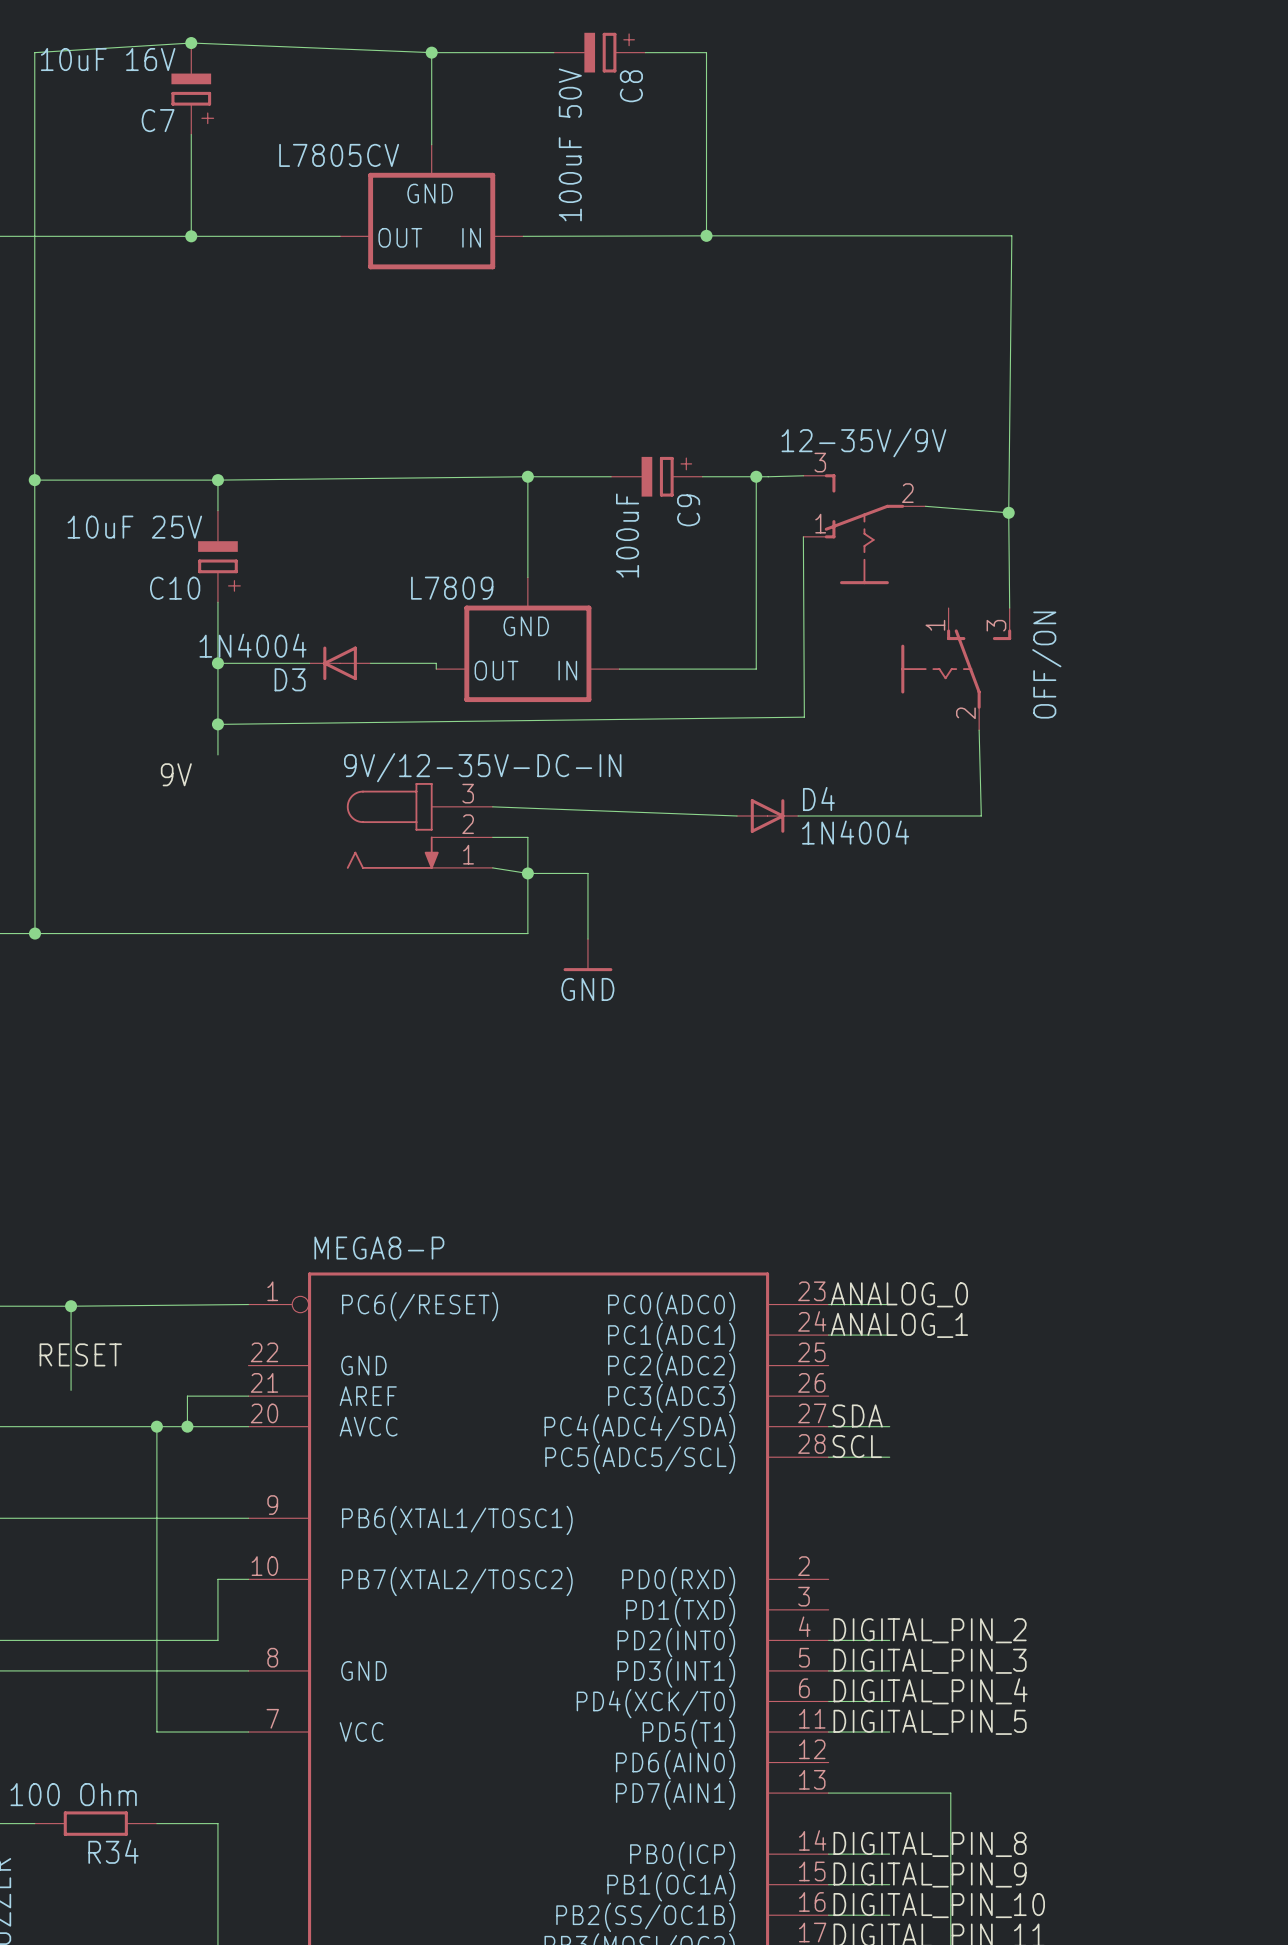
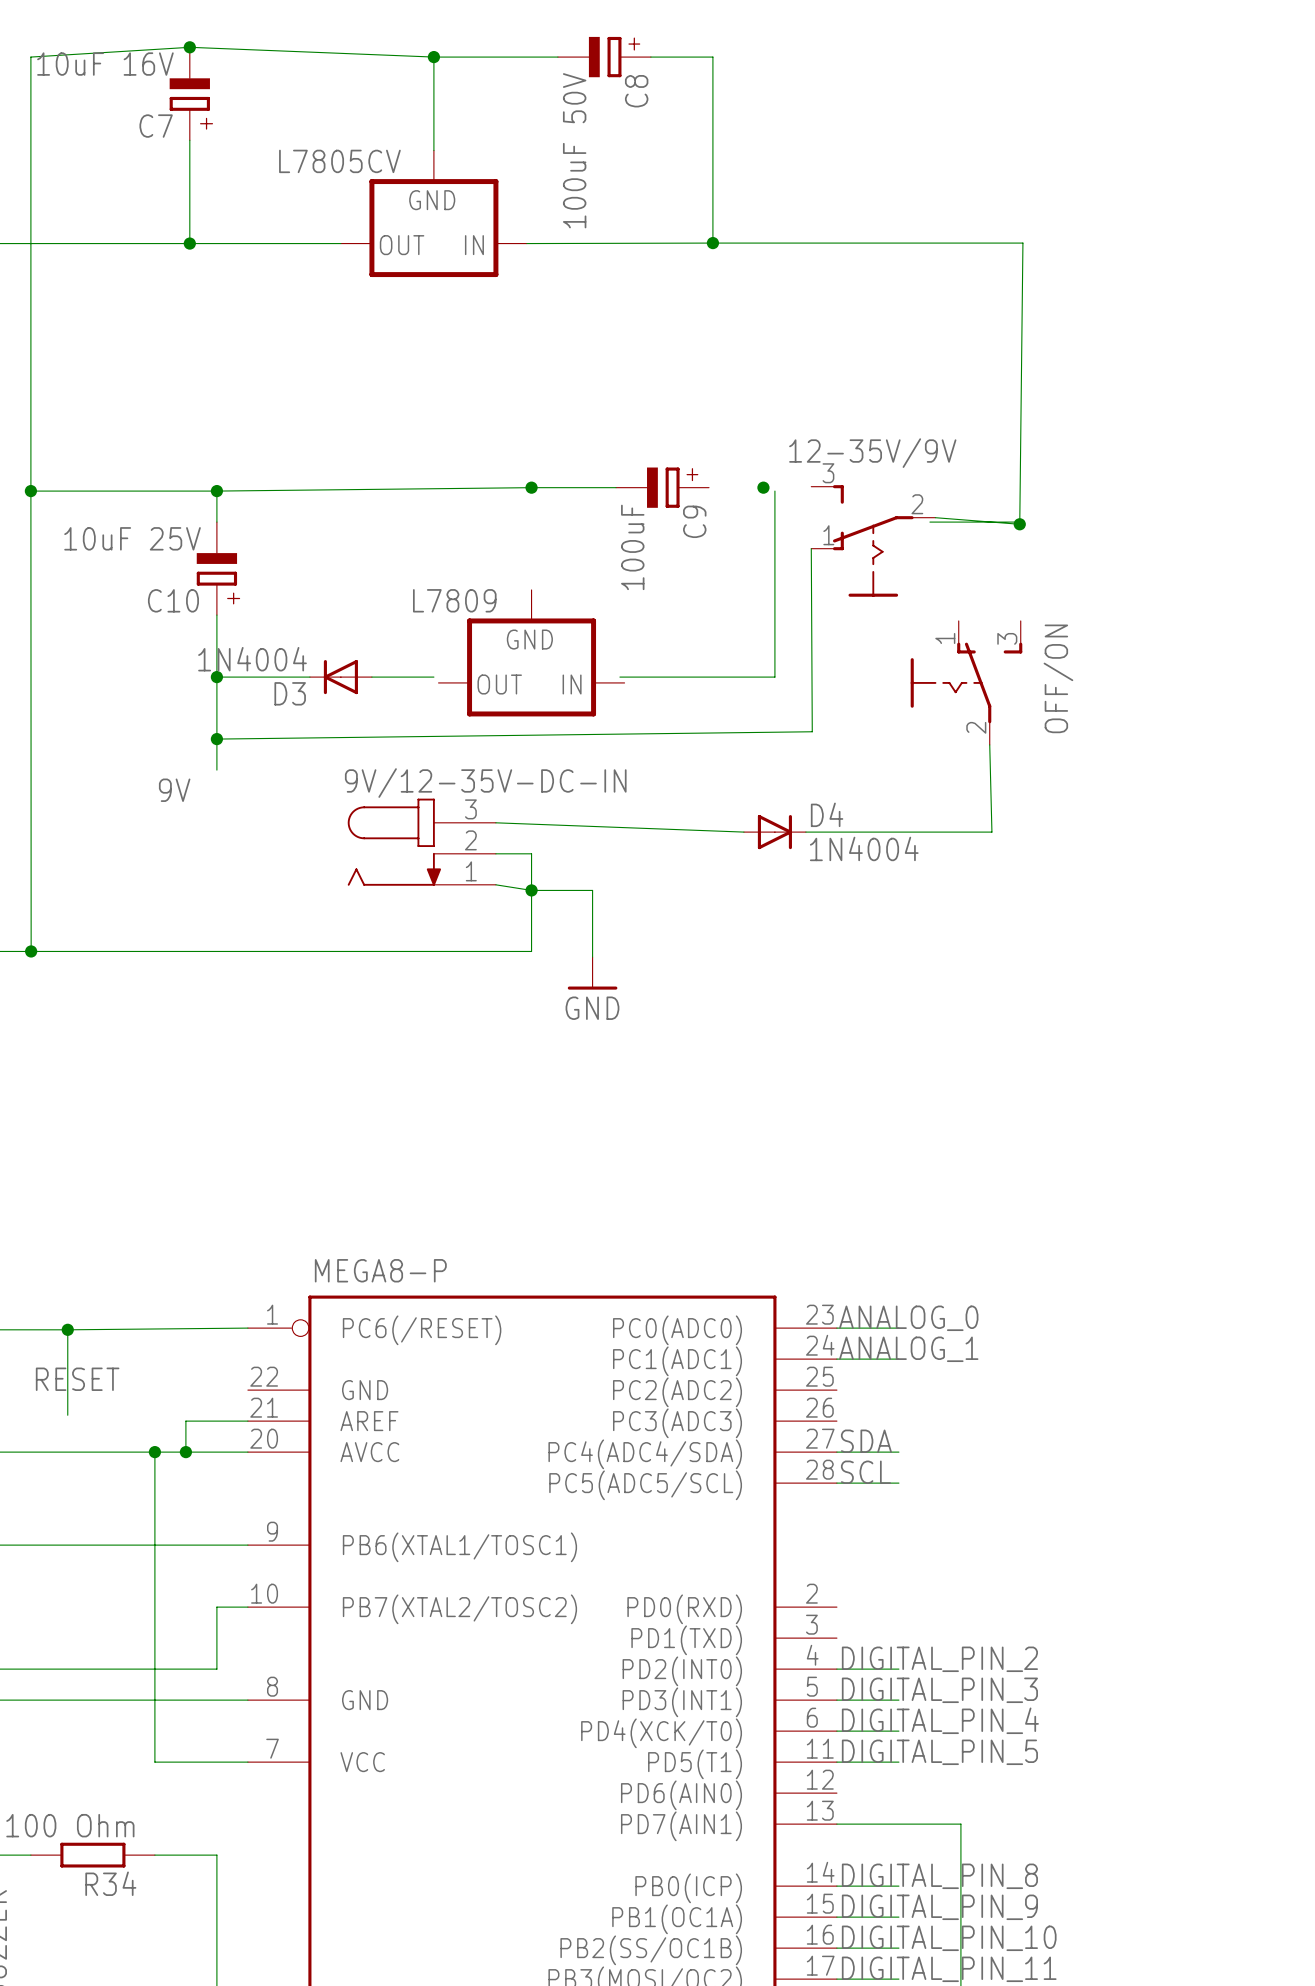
wire: (803, 475) (702, 476) -> none
wire: (527, 476) (527, 577) -> none
wire: (756, 476) (756, 669) (619, 669) -> none
wire: none -> (774, 491) (774, 677) (619, 677)
wire: none -> (929, 522) (1022, 522)
wire: (1008, 512) (1009, 608) -> none
wire: (431, 663) (436, 663) (436, 669) -> none

